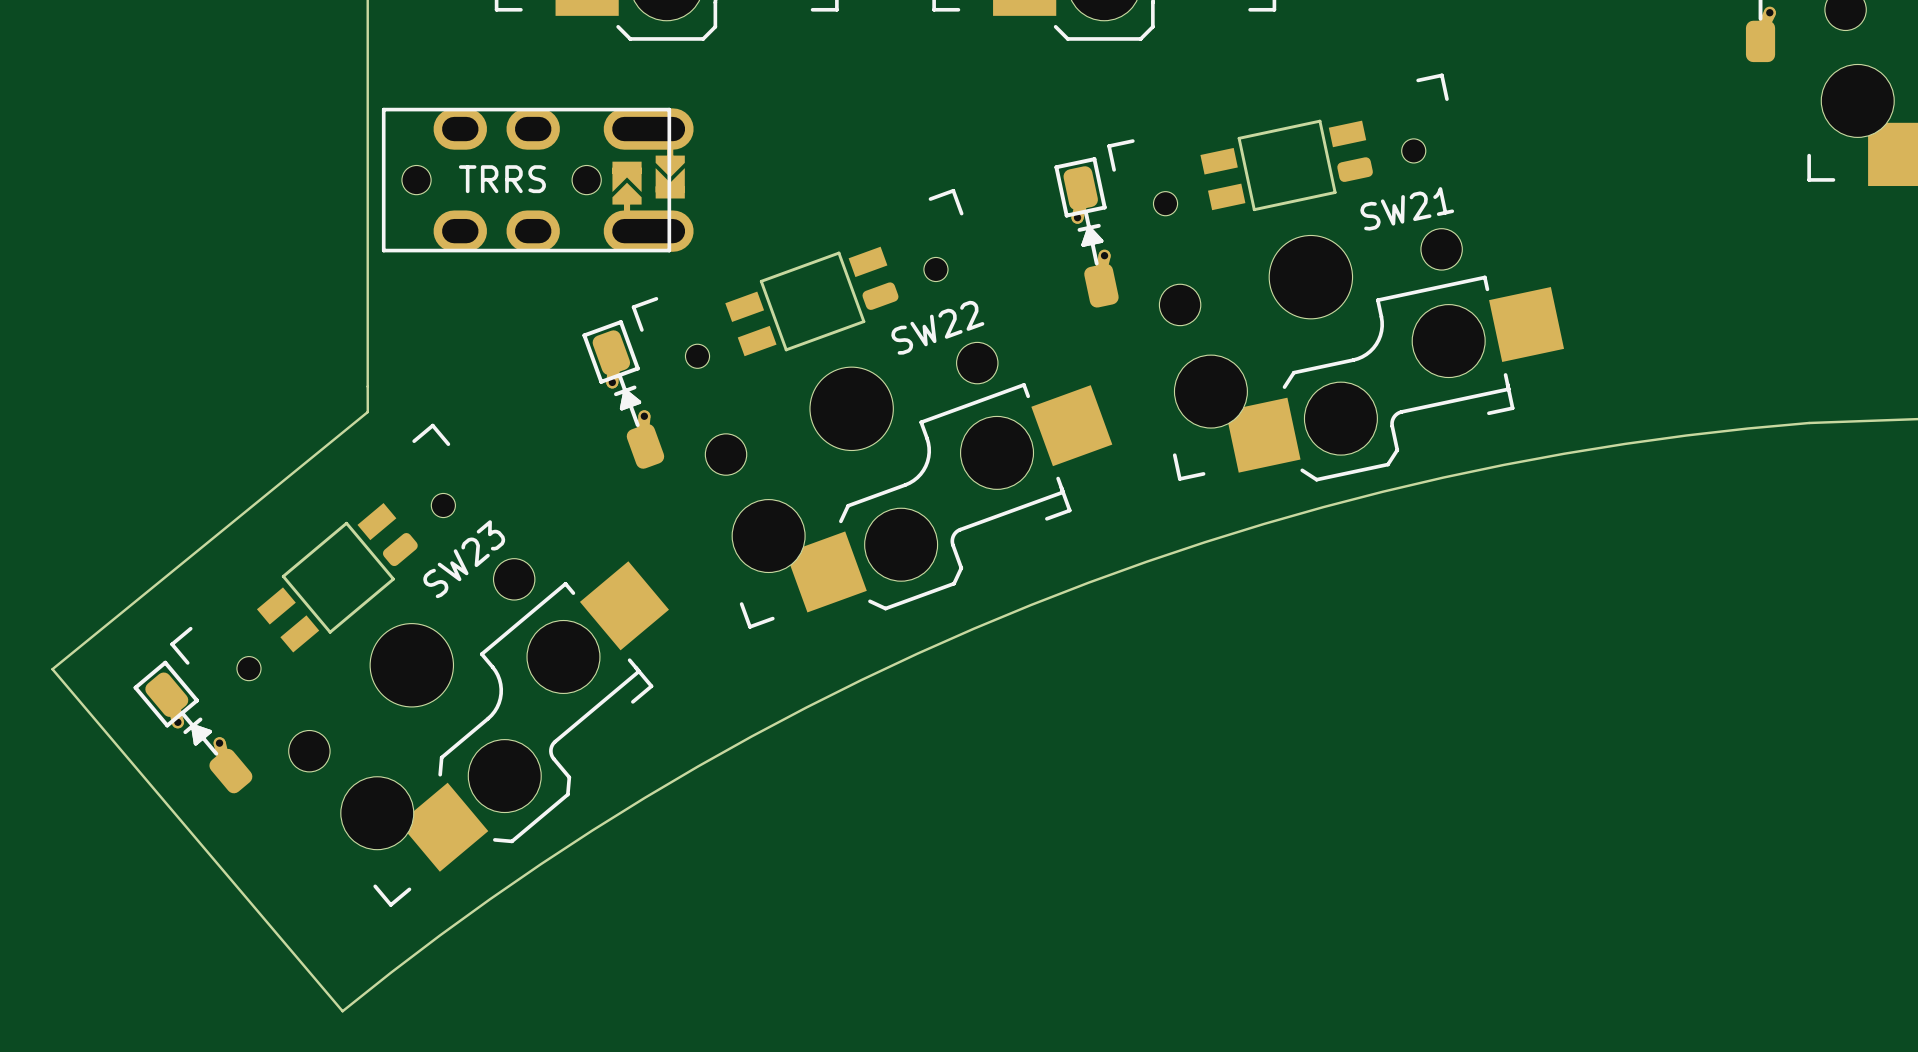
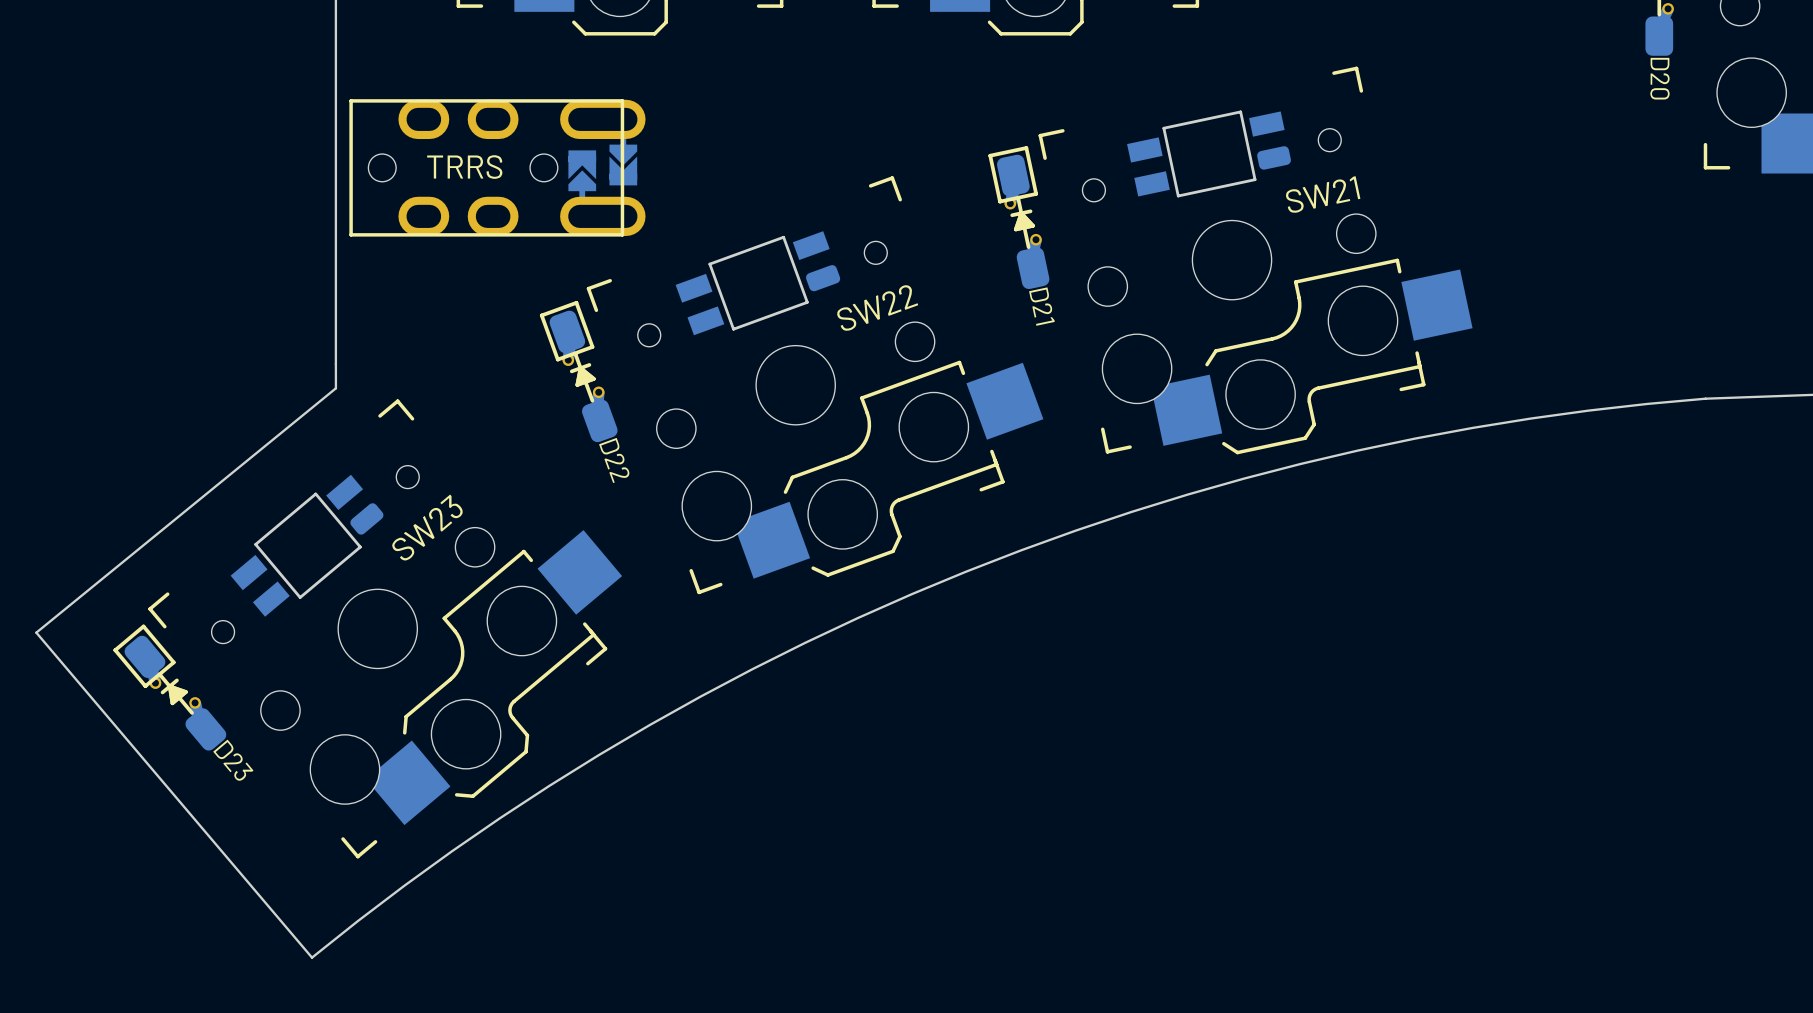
D20 name: none -> D20 (1659, 78)
D21 name: none -> D21 (1041, 306)
D22 name: none -> D22 (614, 460)
D23 name: none -> D23 (233, 760)

